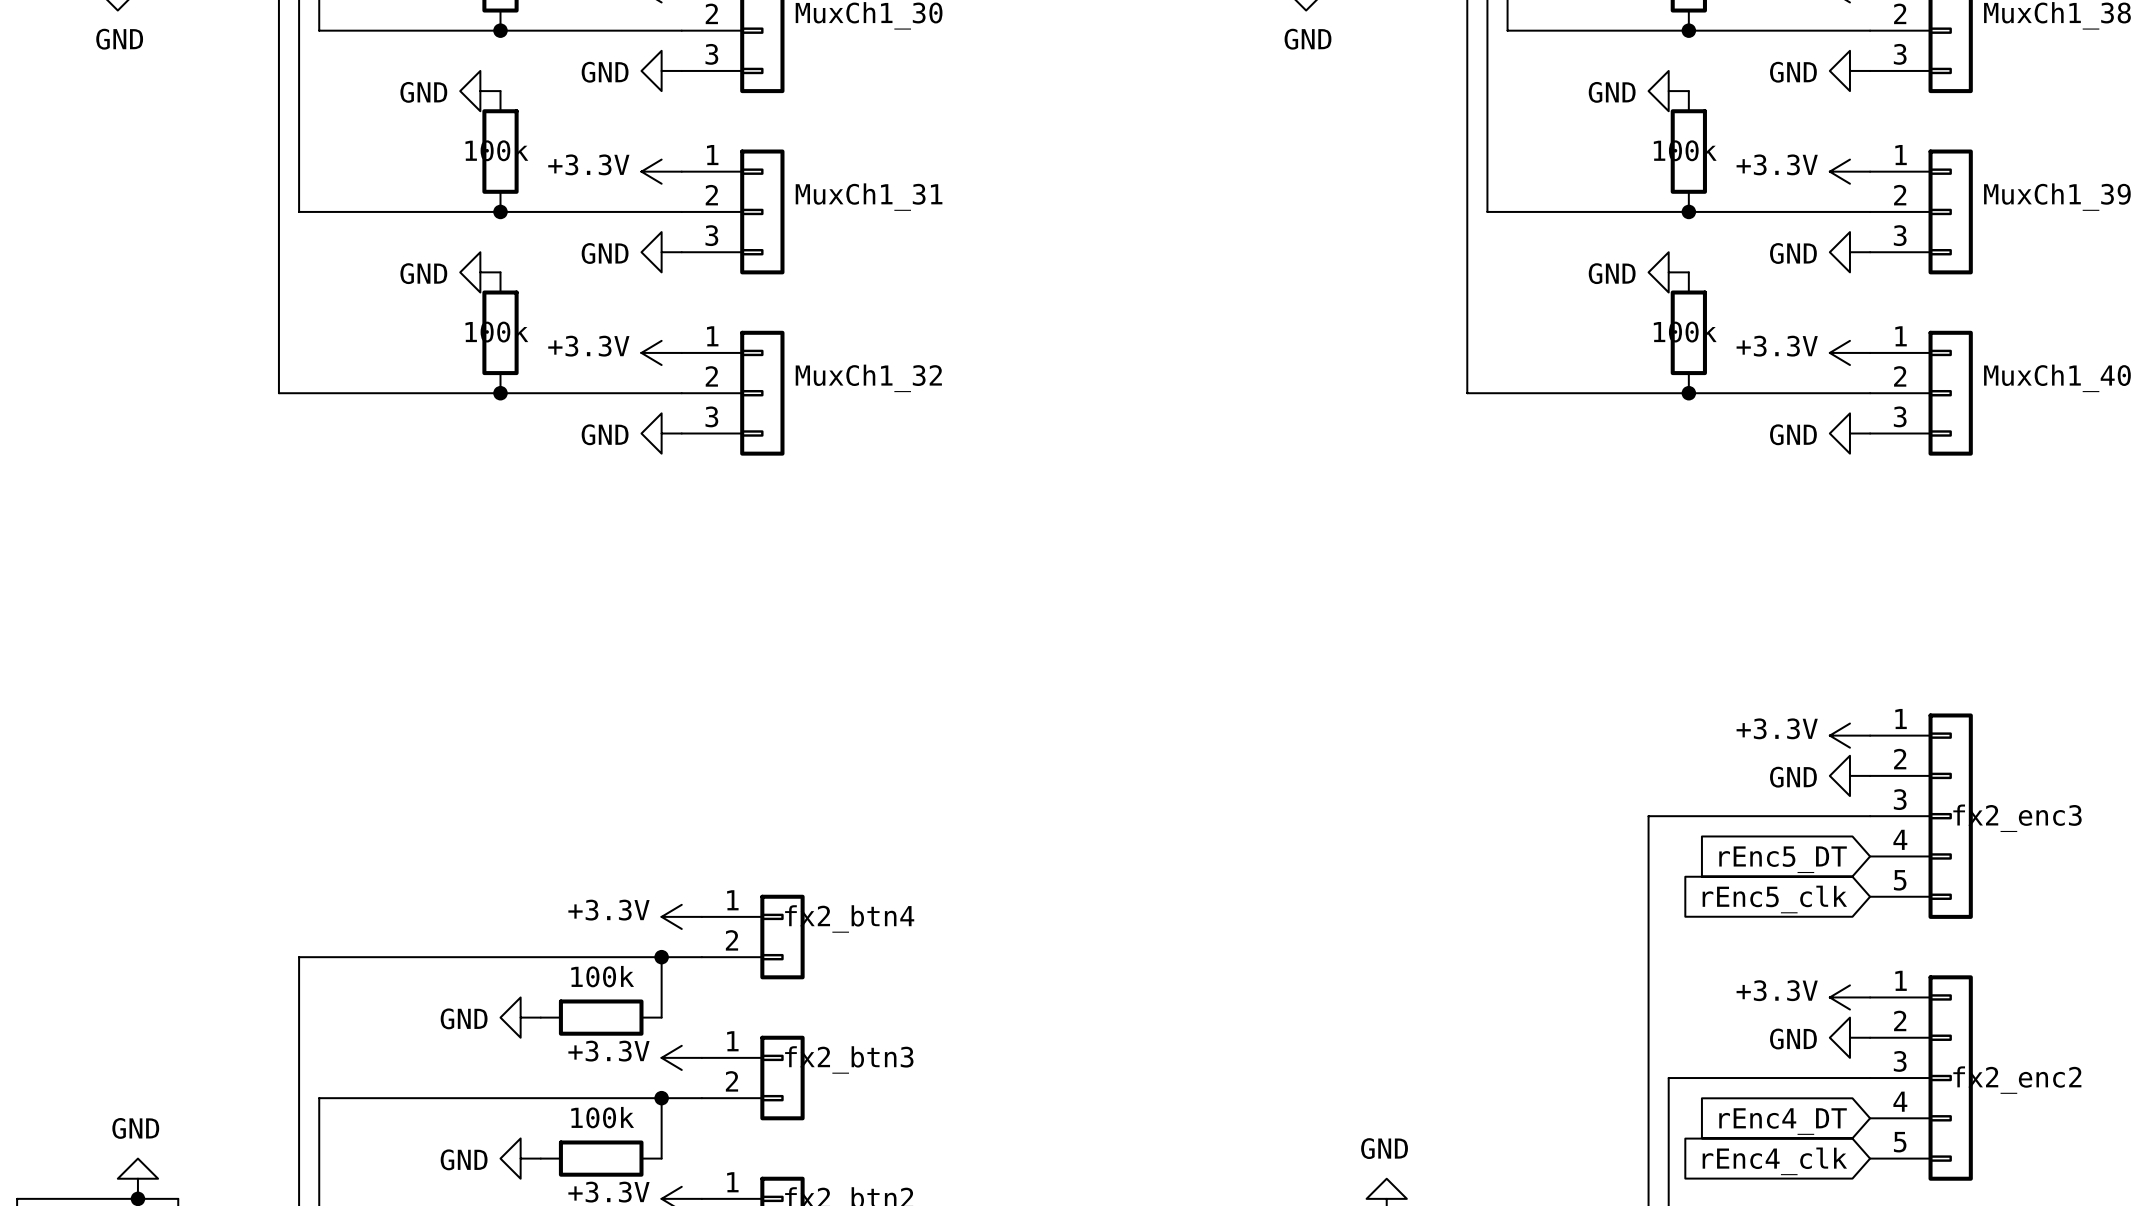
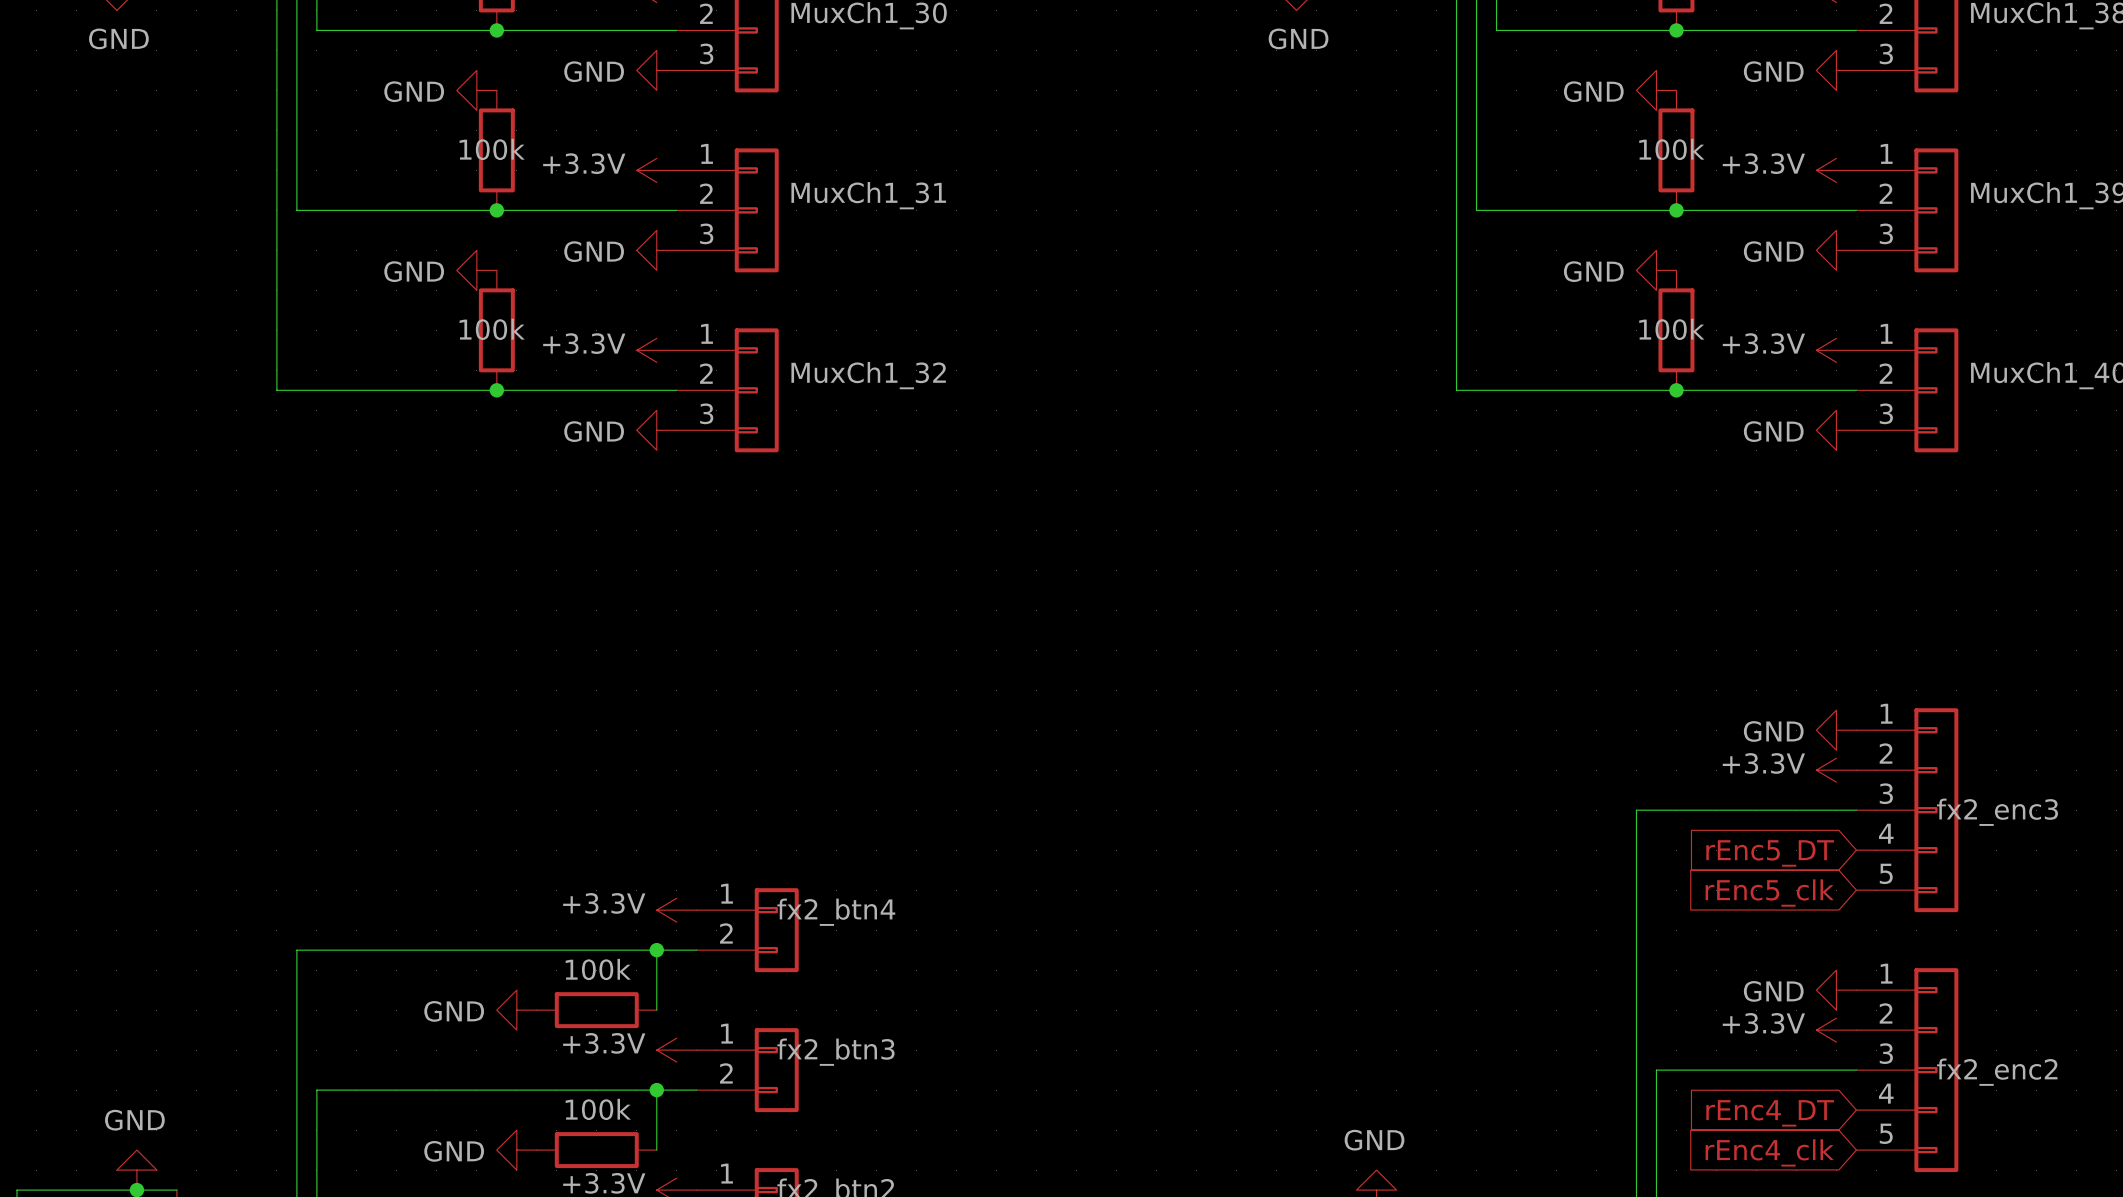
power symbol: +3.3V (1849, 735) -> GND (1836, 730)
power symbol: GND (1849, 775) -> +3.3V (1836, 770)
power symbol: +3.3V (1849, 997) -> GND (1836, 990)
power symbol: GND (1849, 1037) -> +3.3V (1836, 1030)

